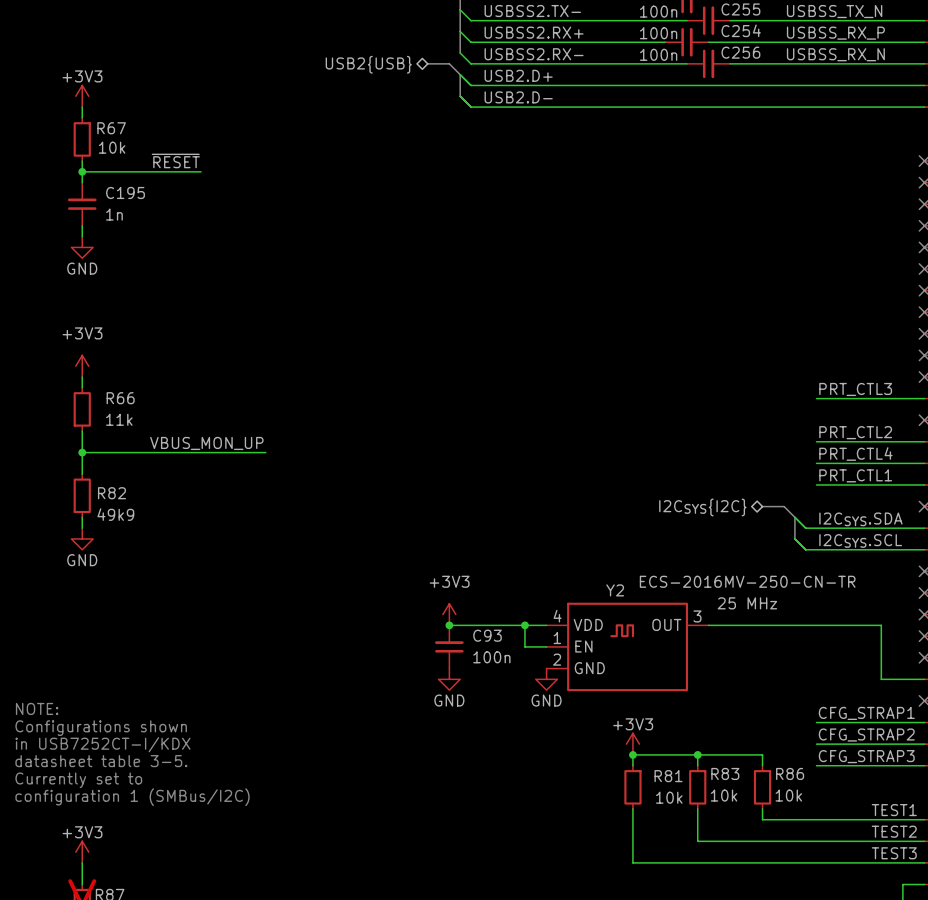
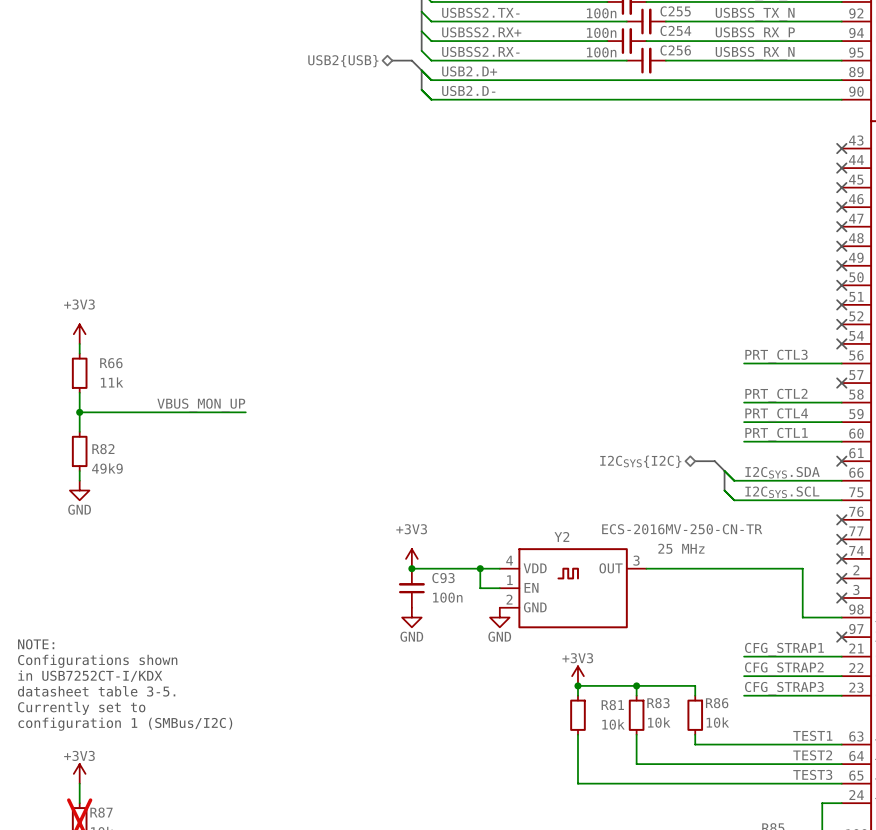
power symbol: +3V3 (82, 96) -> none
wire: (82, 107) (82, 117) -> none
R67: (82, 139) -> none
label: ~{RESET} (175, 160) -> none
wire: (82, 161) (82, 182) -> none
wire: (82, 171) (201, 171) -> none
junction: (82, 171) -> none
C195: (82, 204) -> none
wire: (82, 225) (82, 236) -> none
power symbol: GND (82, 247) -> none

